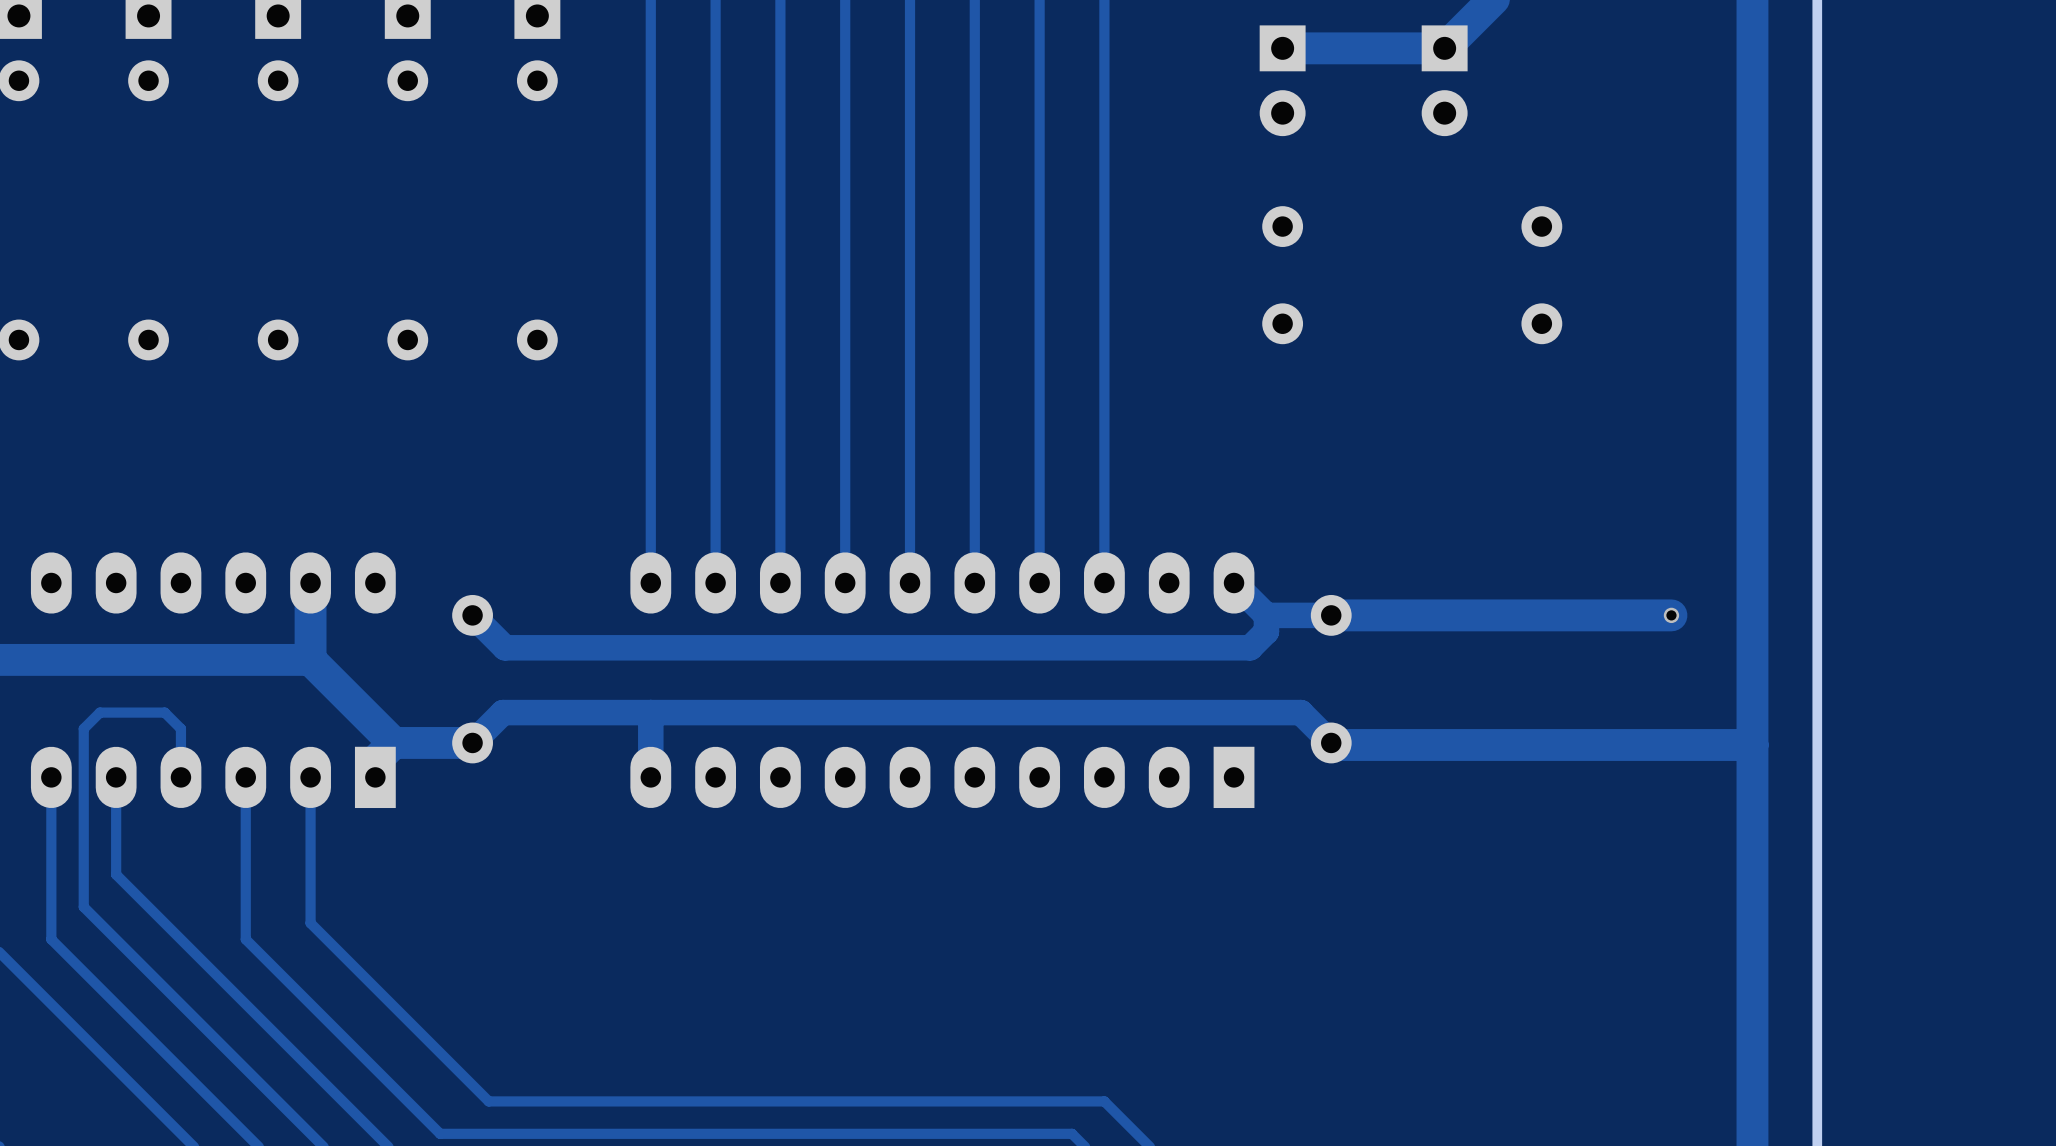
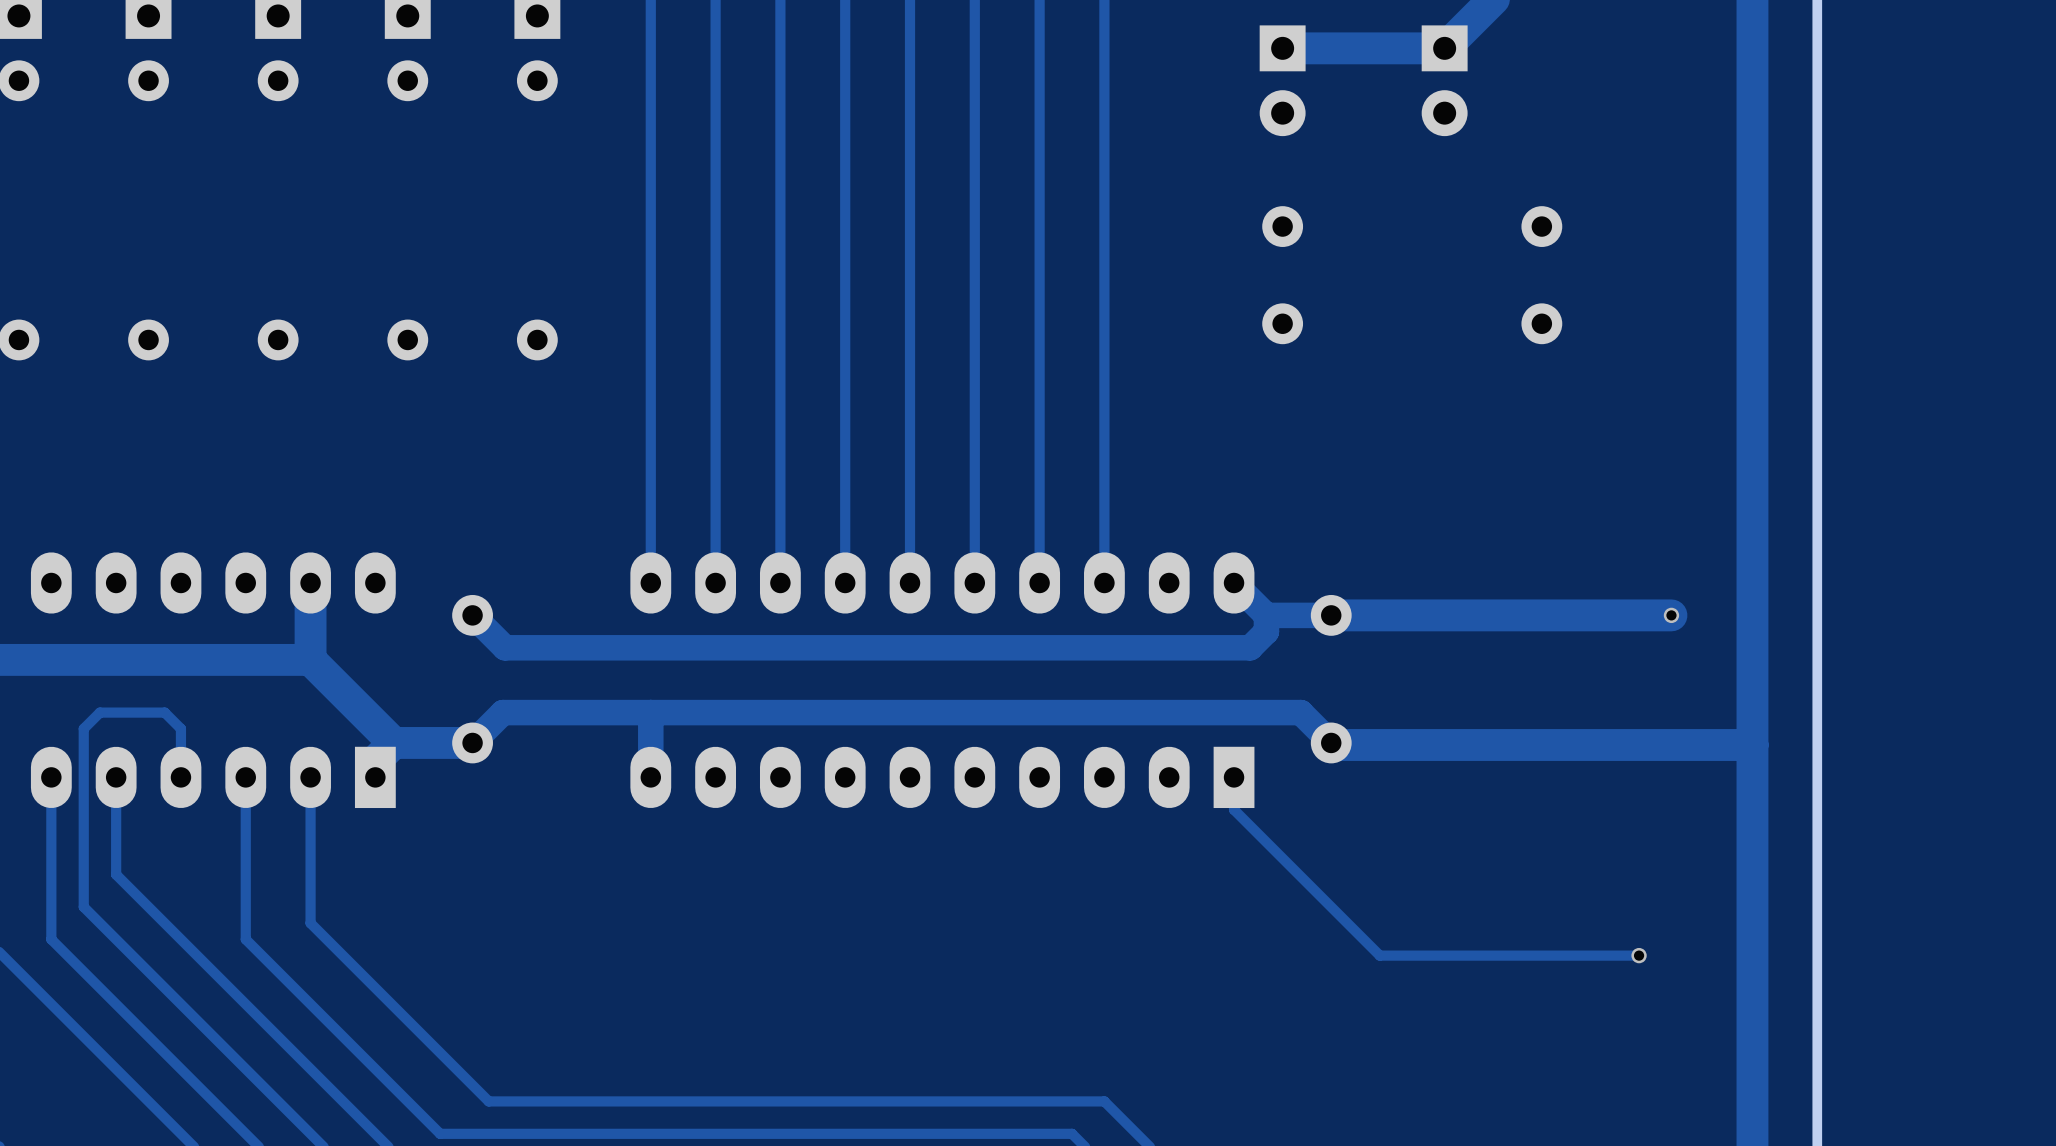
track: none -> (1234, 777) (1234, 809) (1379, 955) (1639, 955)
via: none -> (1639, 955)

